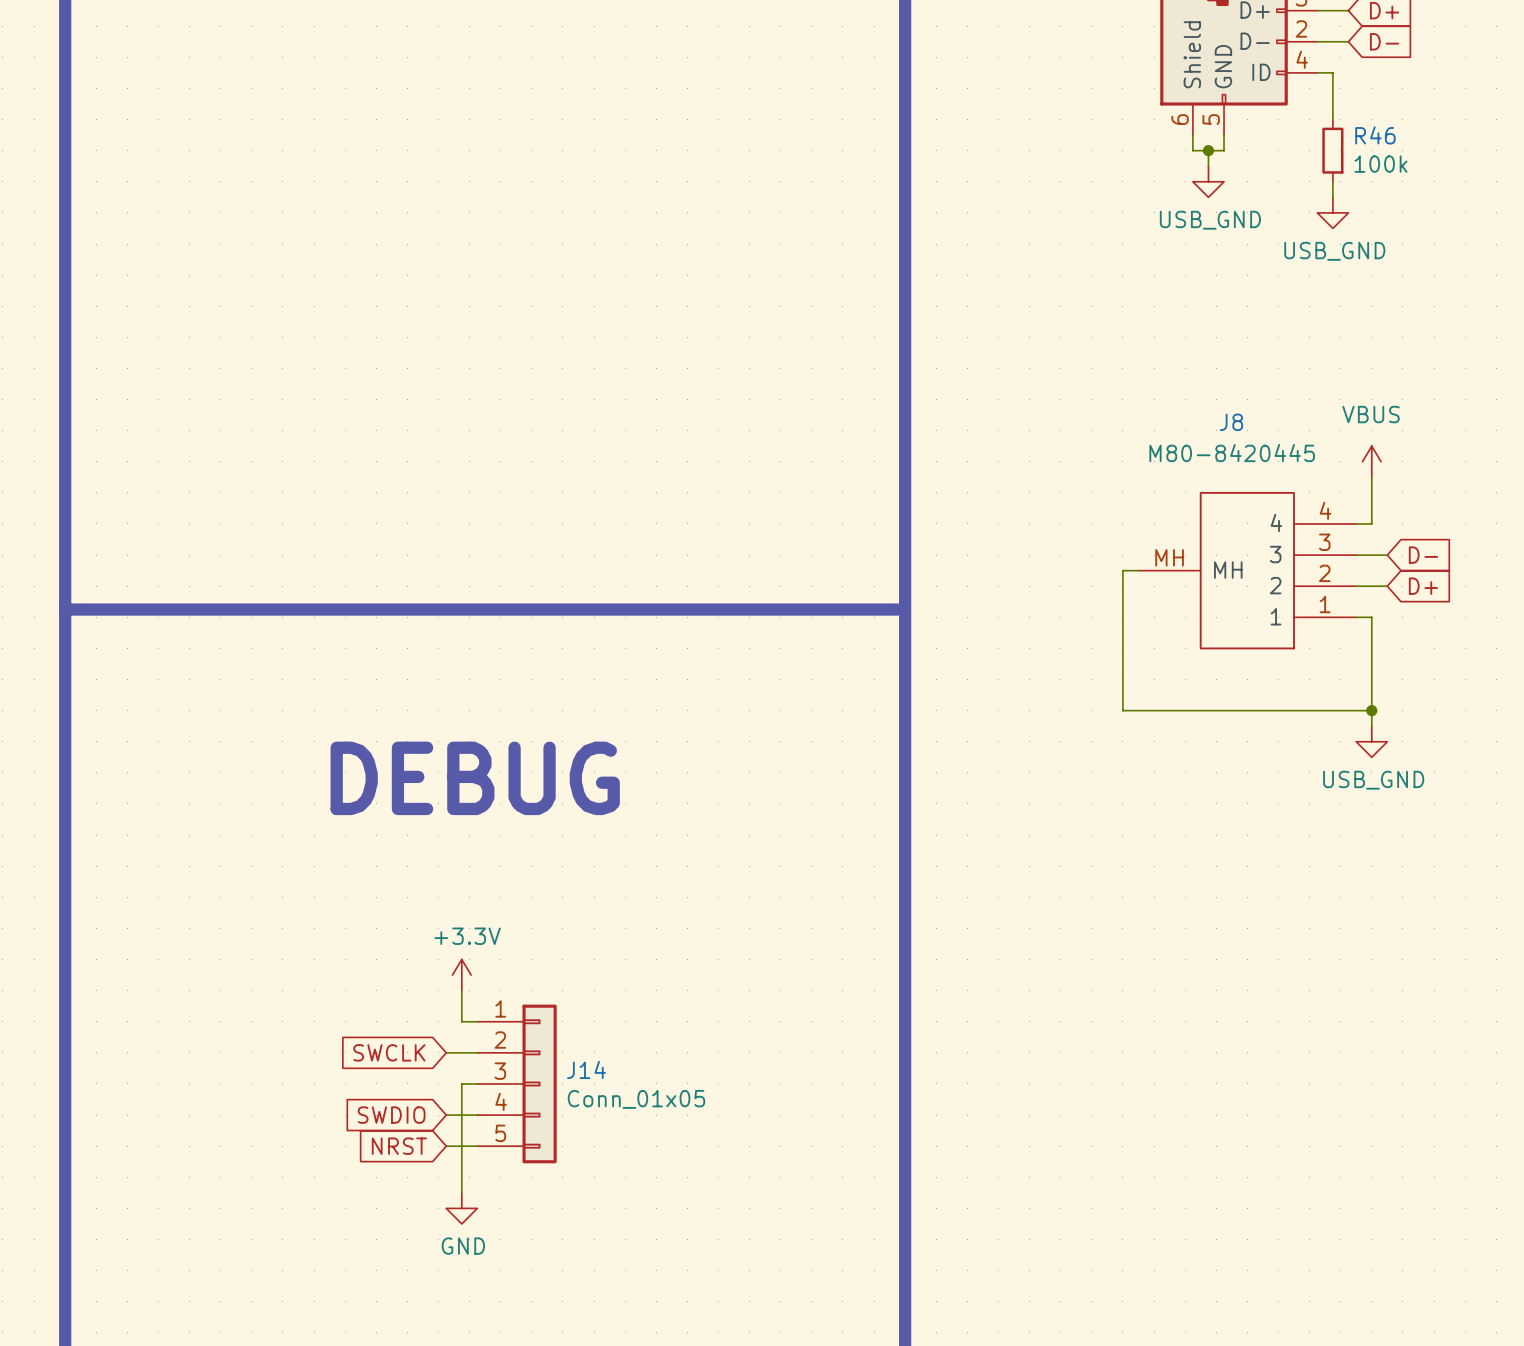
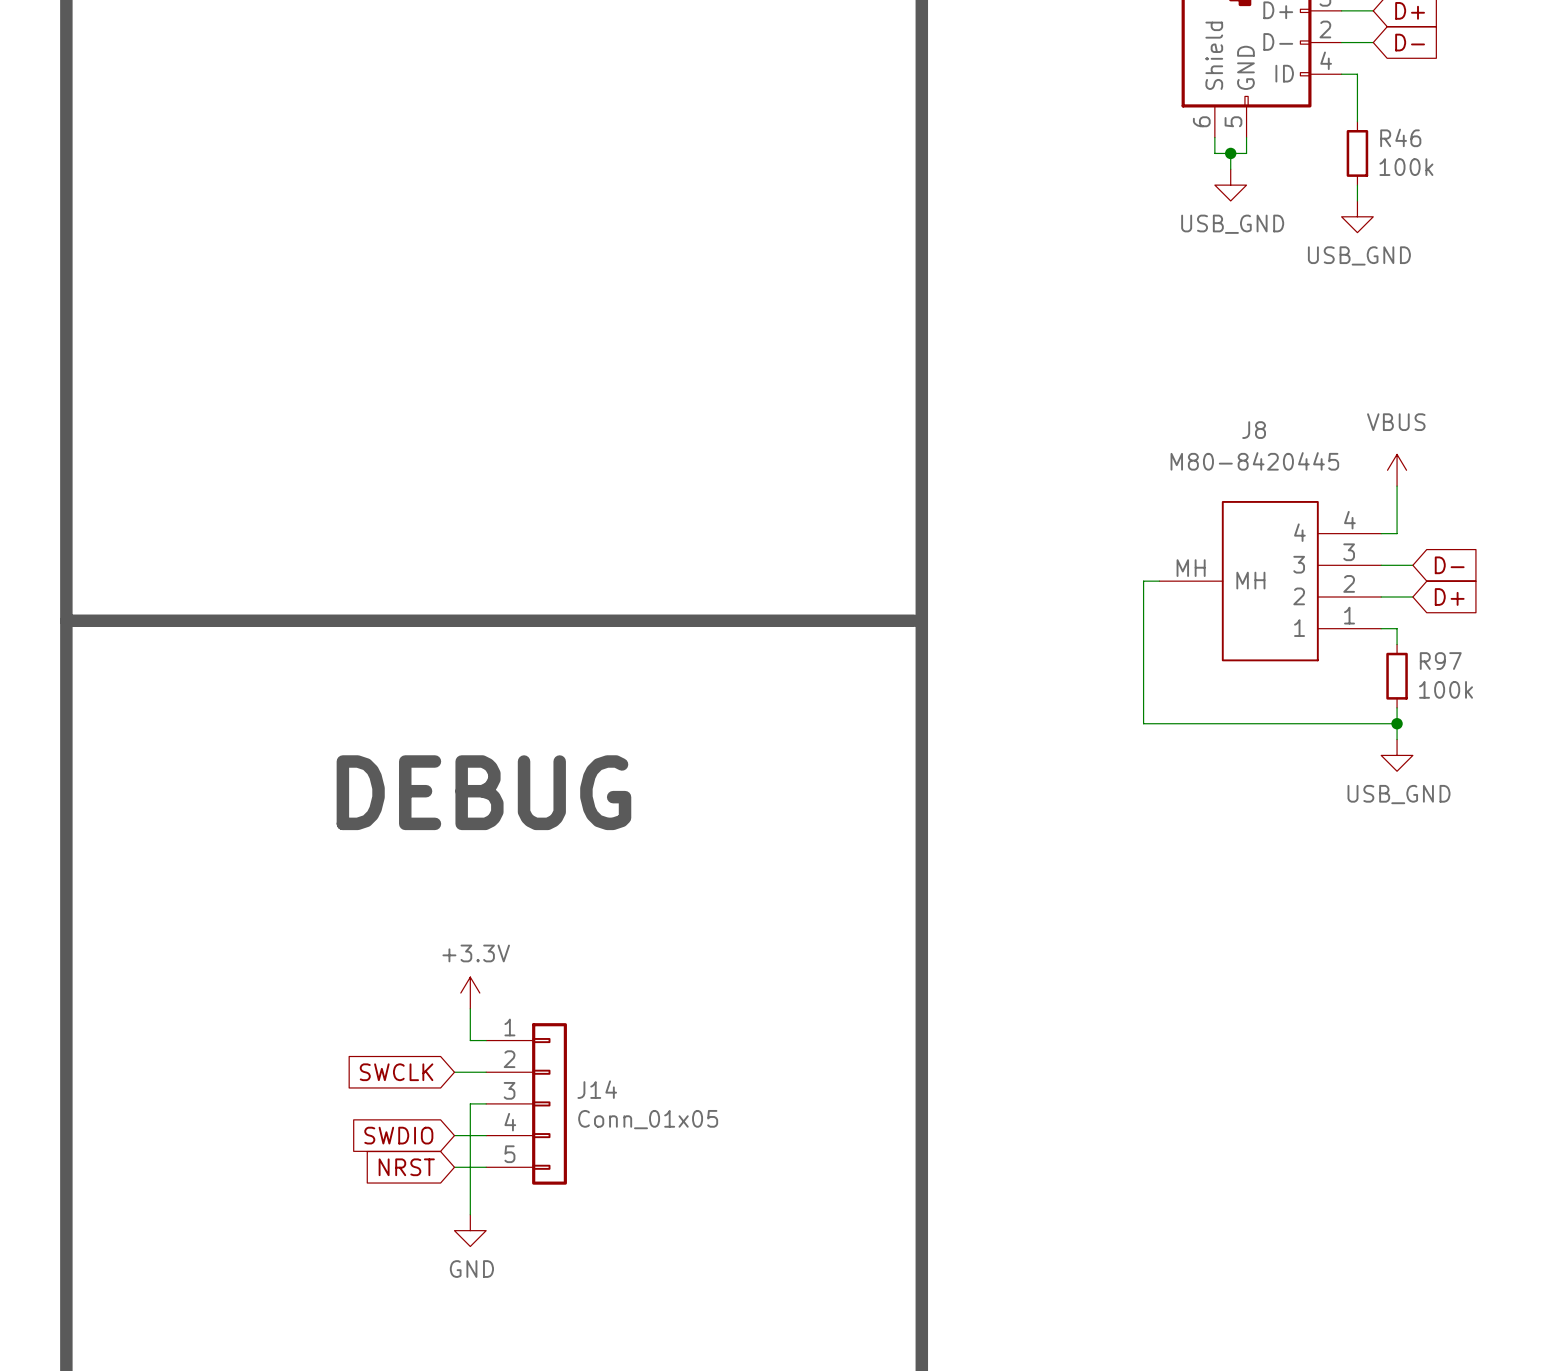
wire: (1371, 632) (1371, 695) -> none
R97: none -> 100k (1397, 676)

